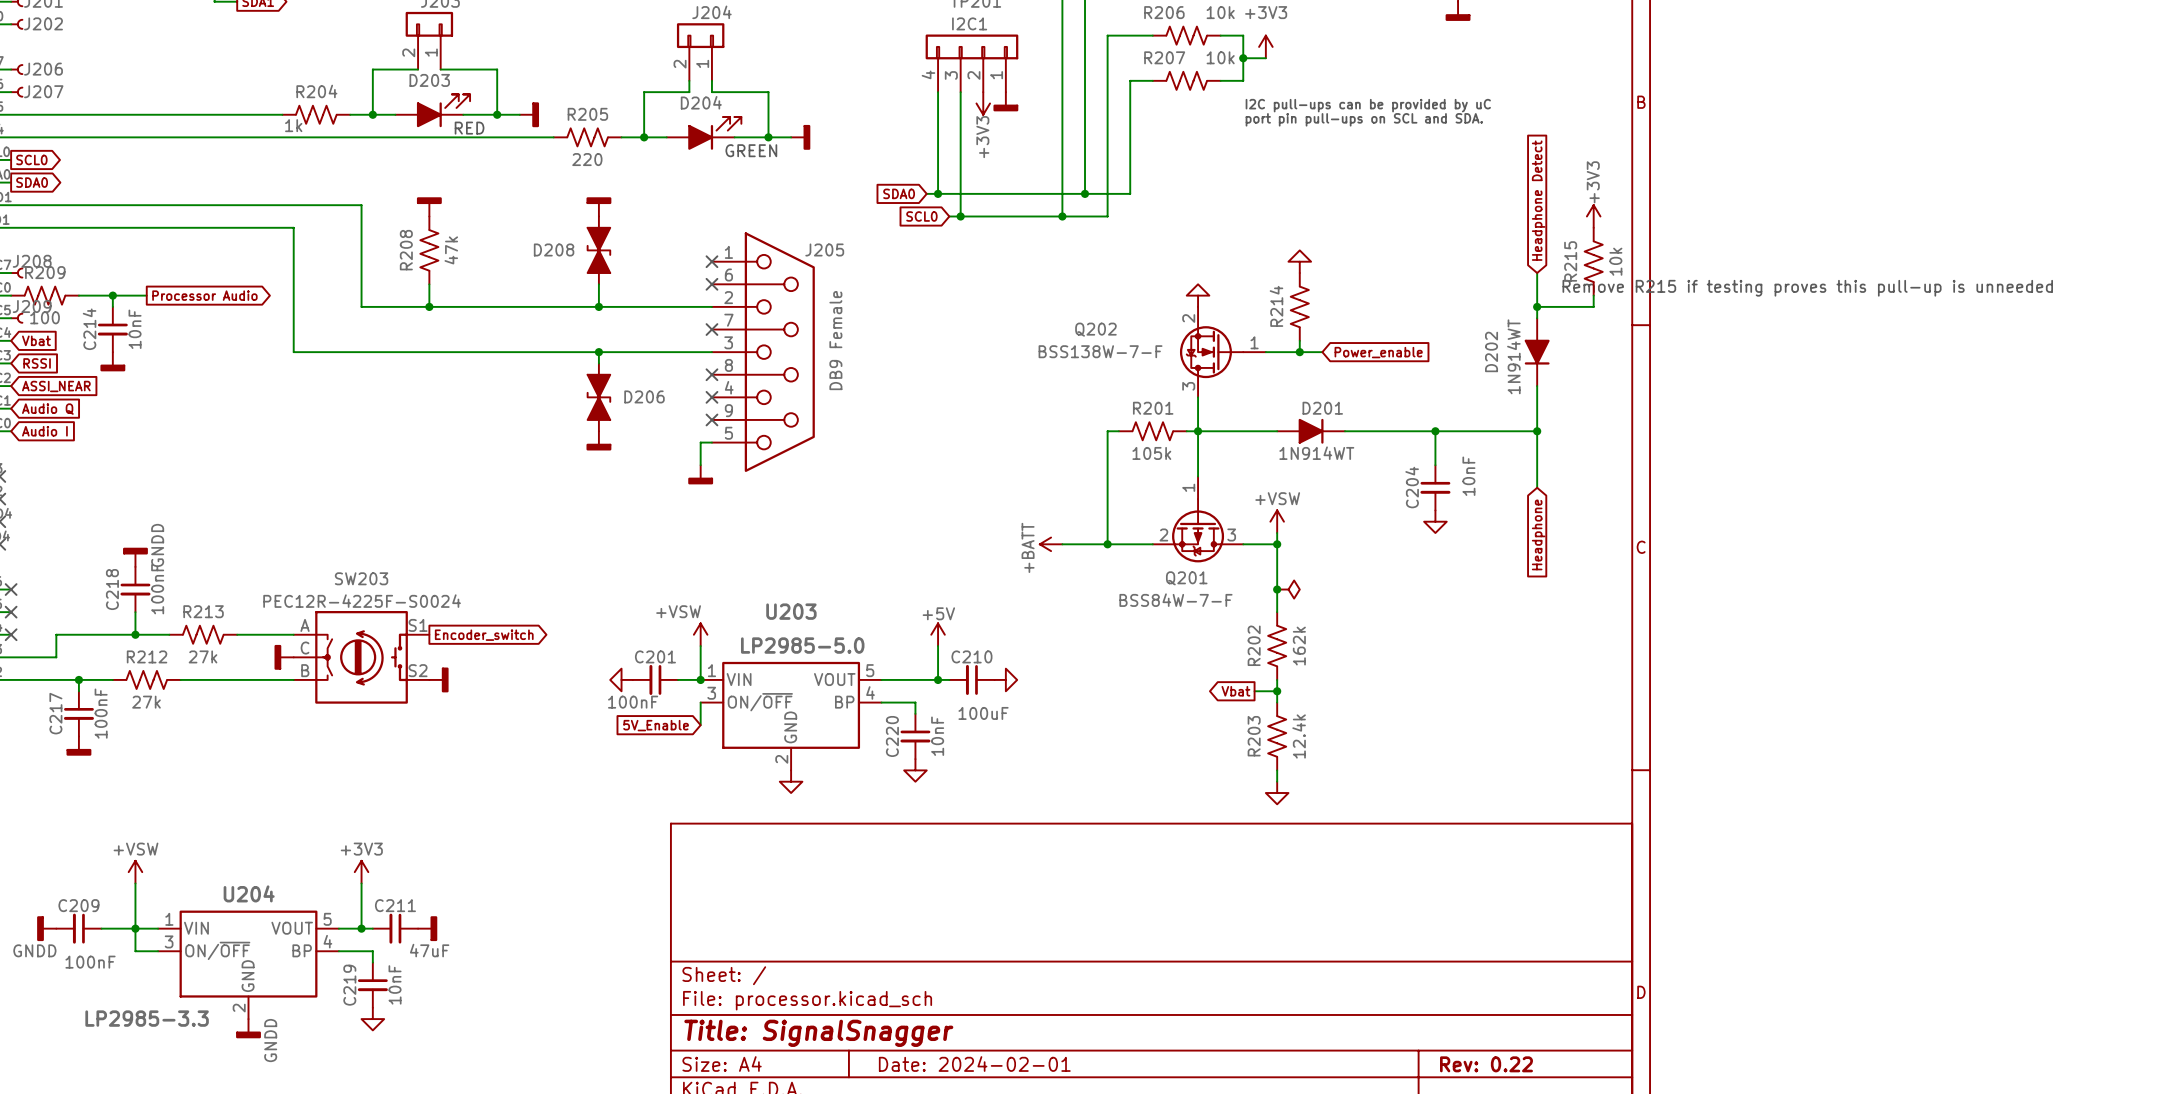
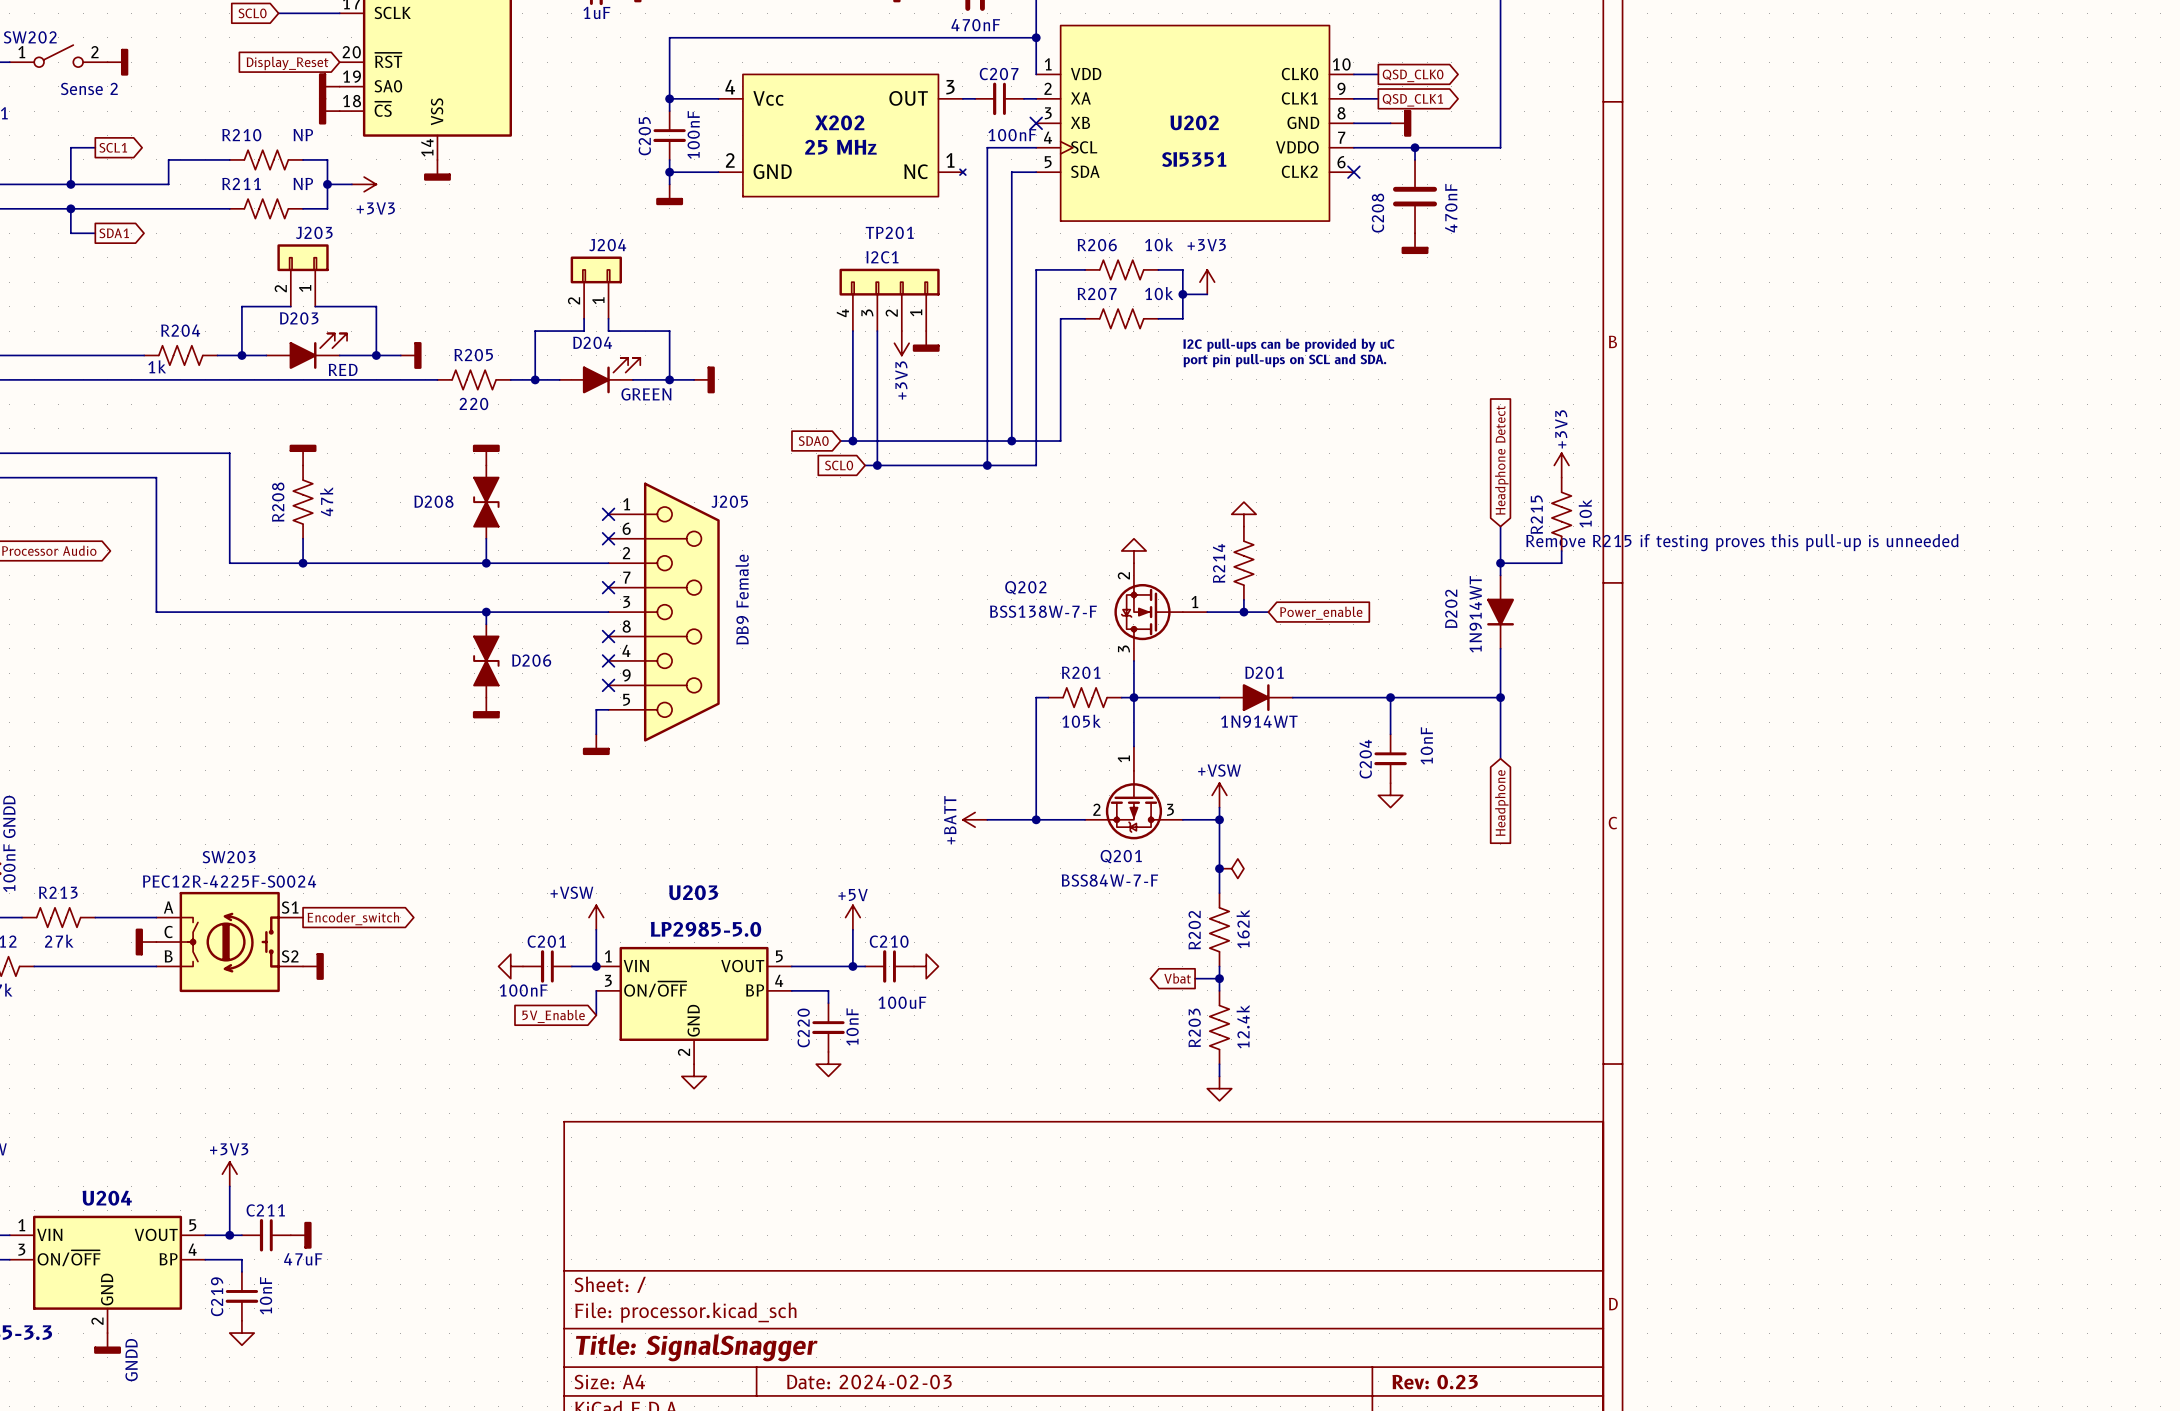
title block: Date: 2024-02-01 (974, 1064) -> Date: 2024-02-03 (869, 1382)
title block: Rev: 0.22 (1486, 1064) -> Rev: 0.23 (1435, 1382)

